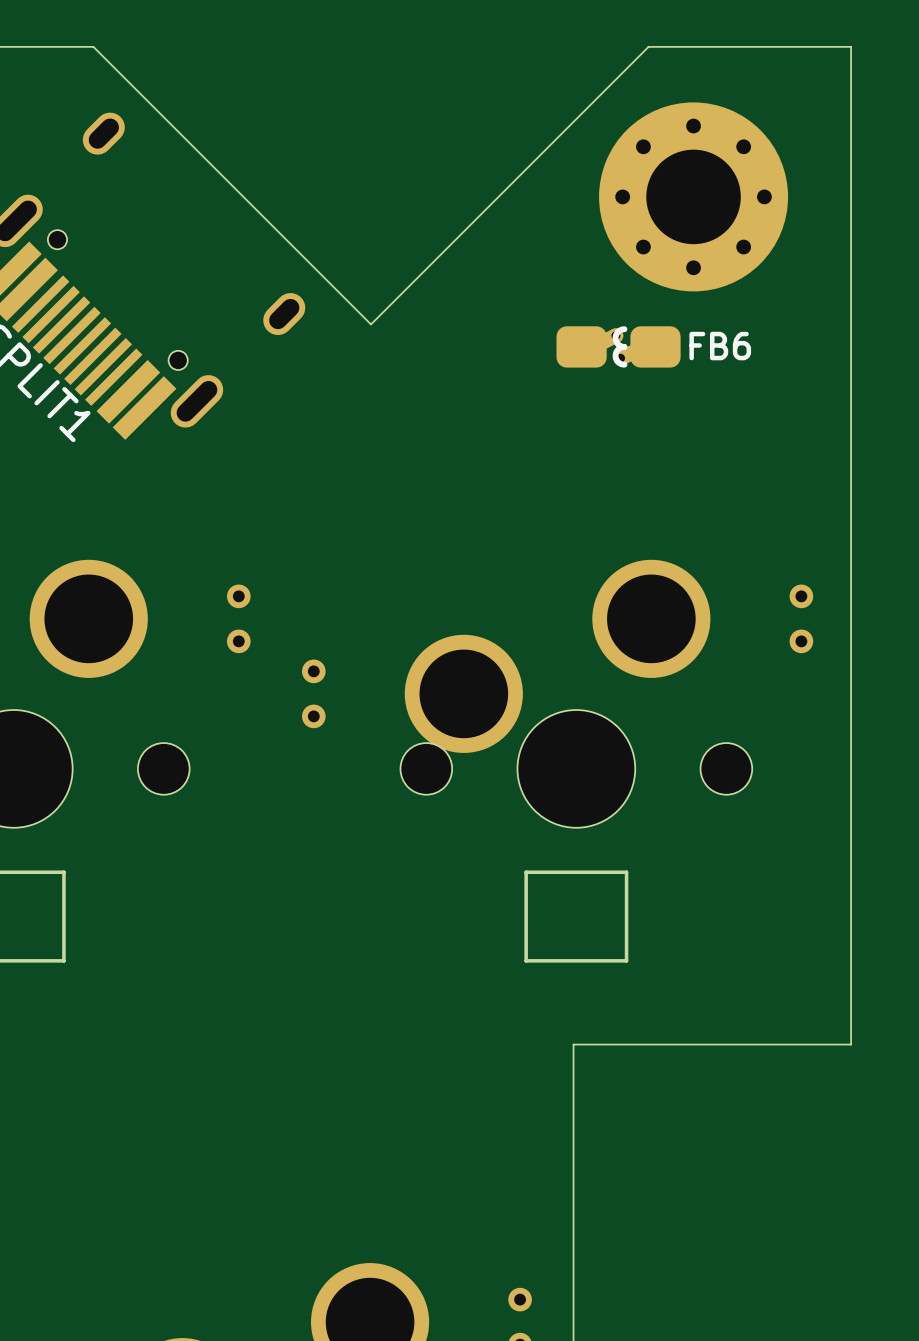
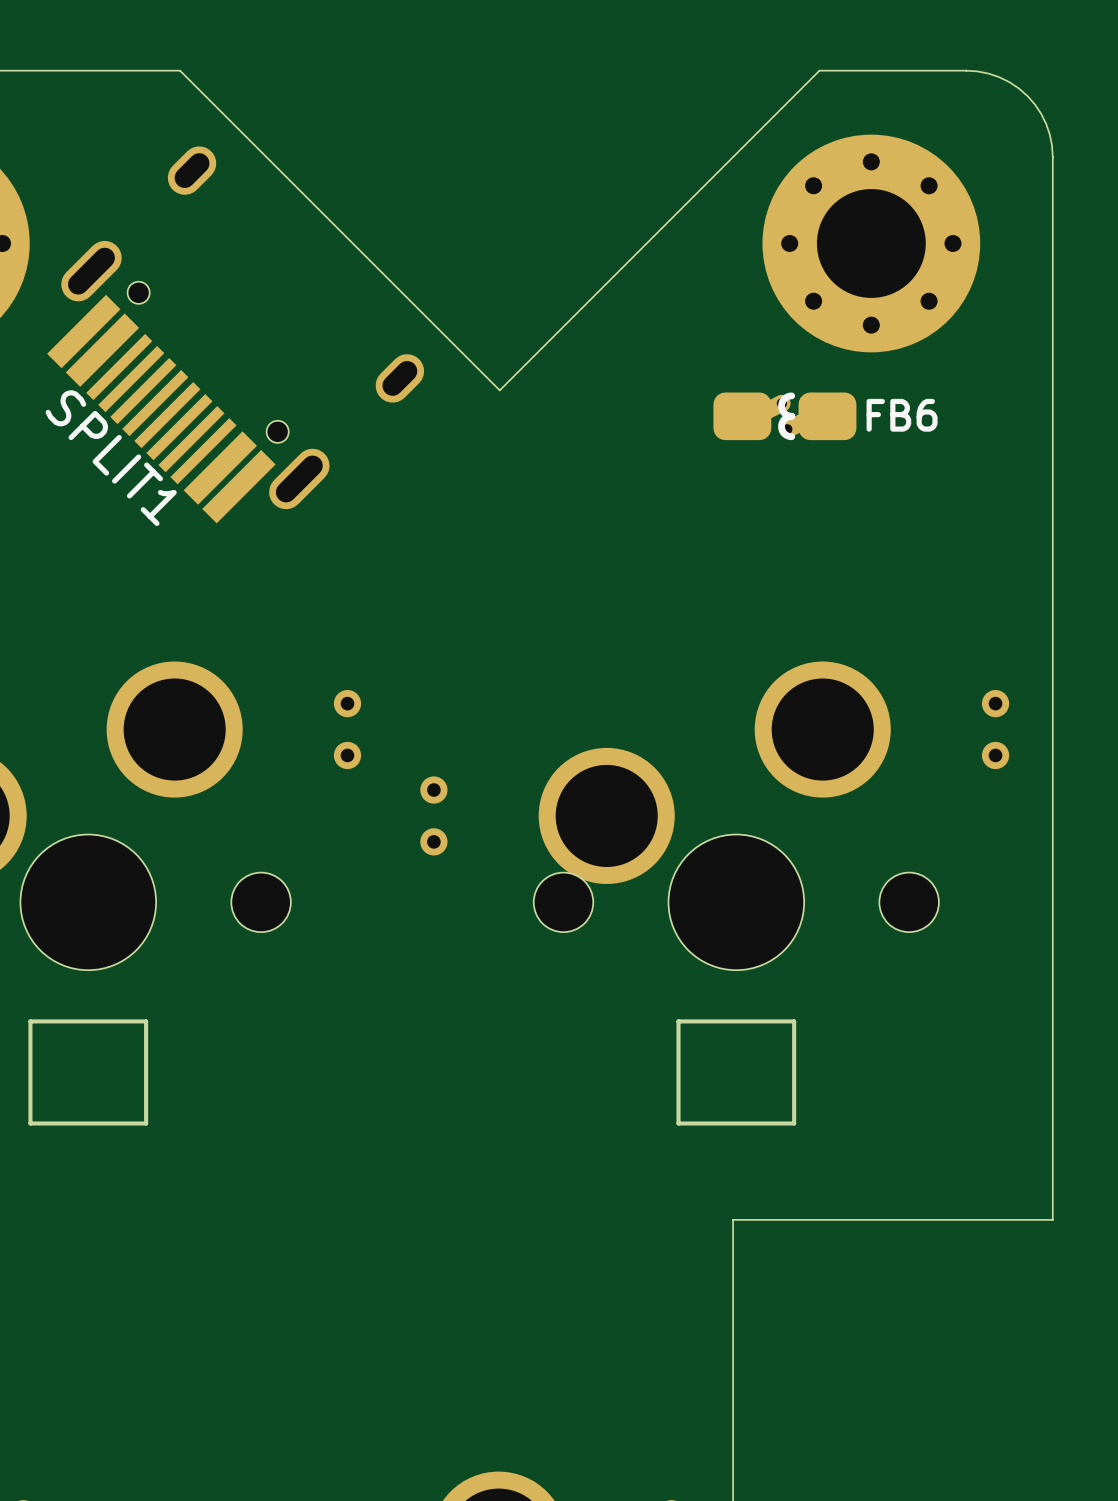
board edge: (776, 46) (851, 46) (851, 121) -> (966, 70) (999, 77) (1027, 95) (1046, 124) (1052, 157)

